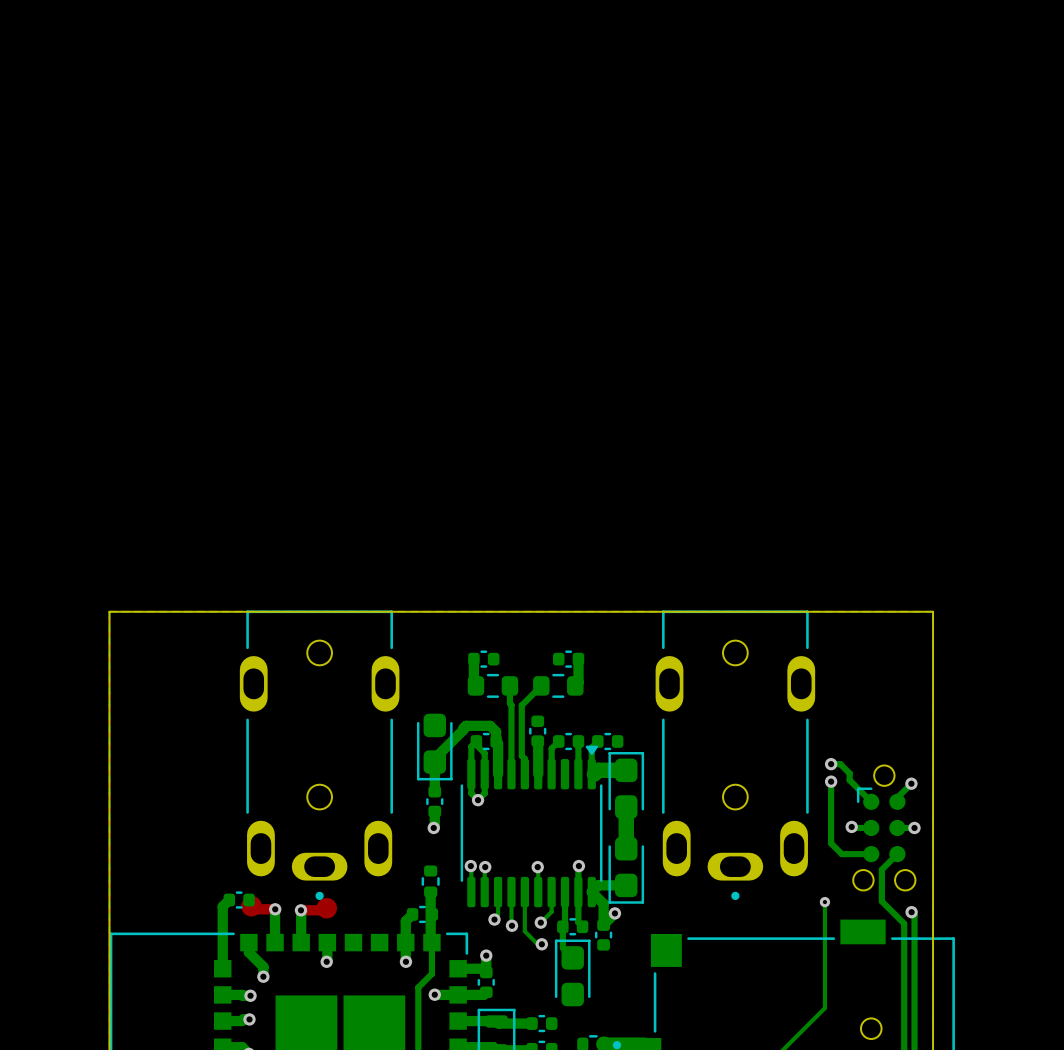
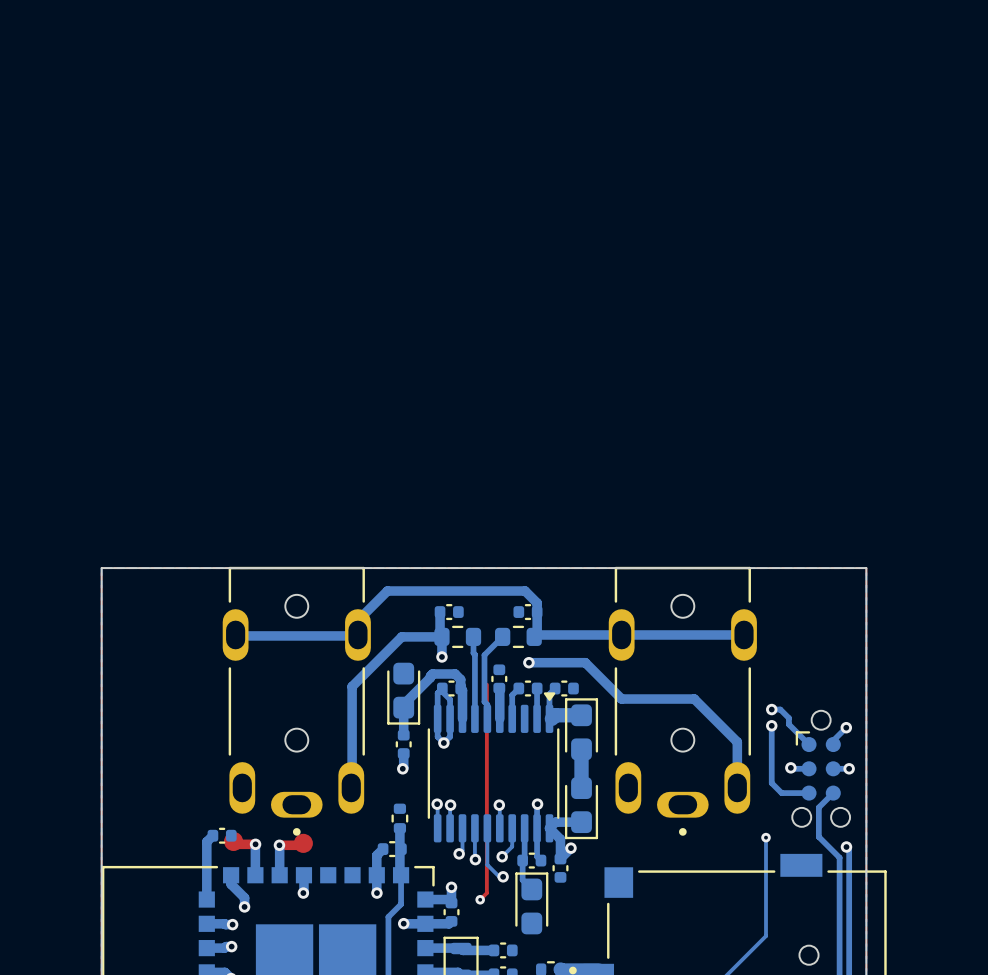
bottom track: none -> (537, 612) (537, 603) (525, 591) (387, 591) (358, 619) (358, 635) (236, 635)
bottom track: none -> (744, 634) (536, 634)
bottom track: none -> (441, 656) (441, 636) (401, 636) (352, 686) (352, 788)
via: none -> (441, 656)
bottom track: none -> (527, 662) (585, 662) (621, 699) (694, 699) (737, 742) (737, 787)
via: none -> (528, 662)
top track: none -> (486, 684) (486, 893) (480, 899)
via: none -> (480, 899)

